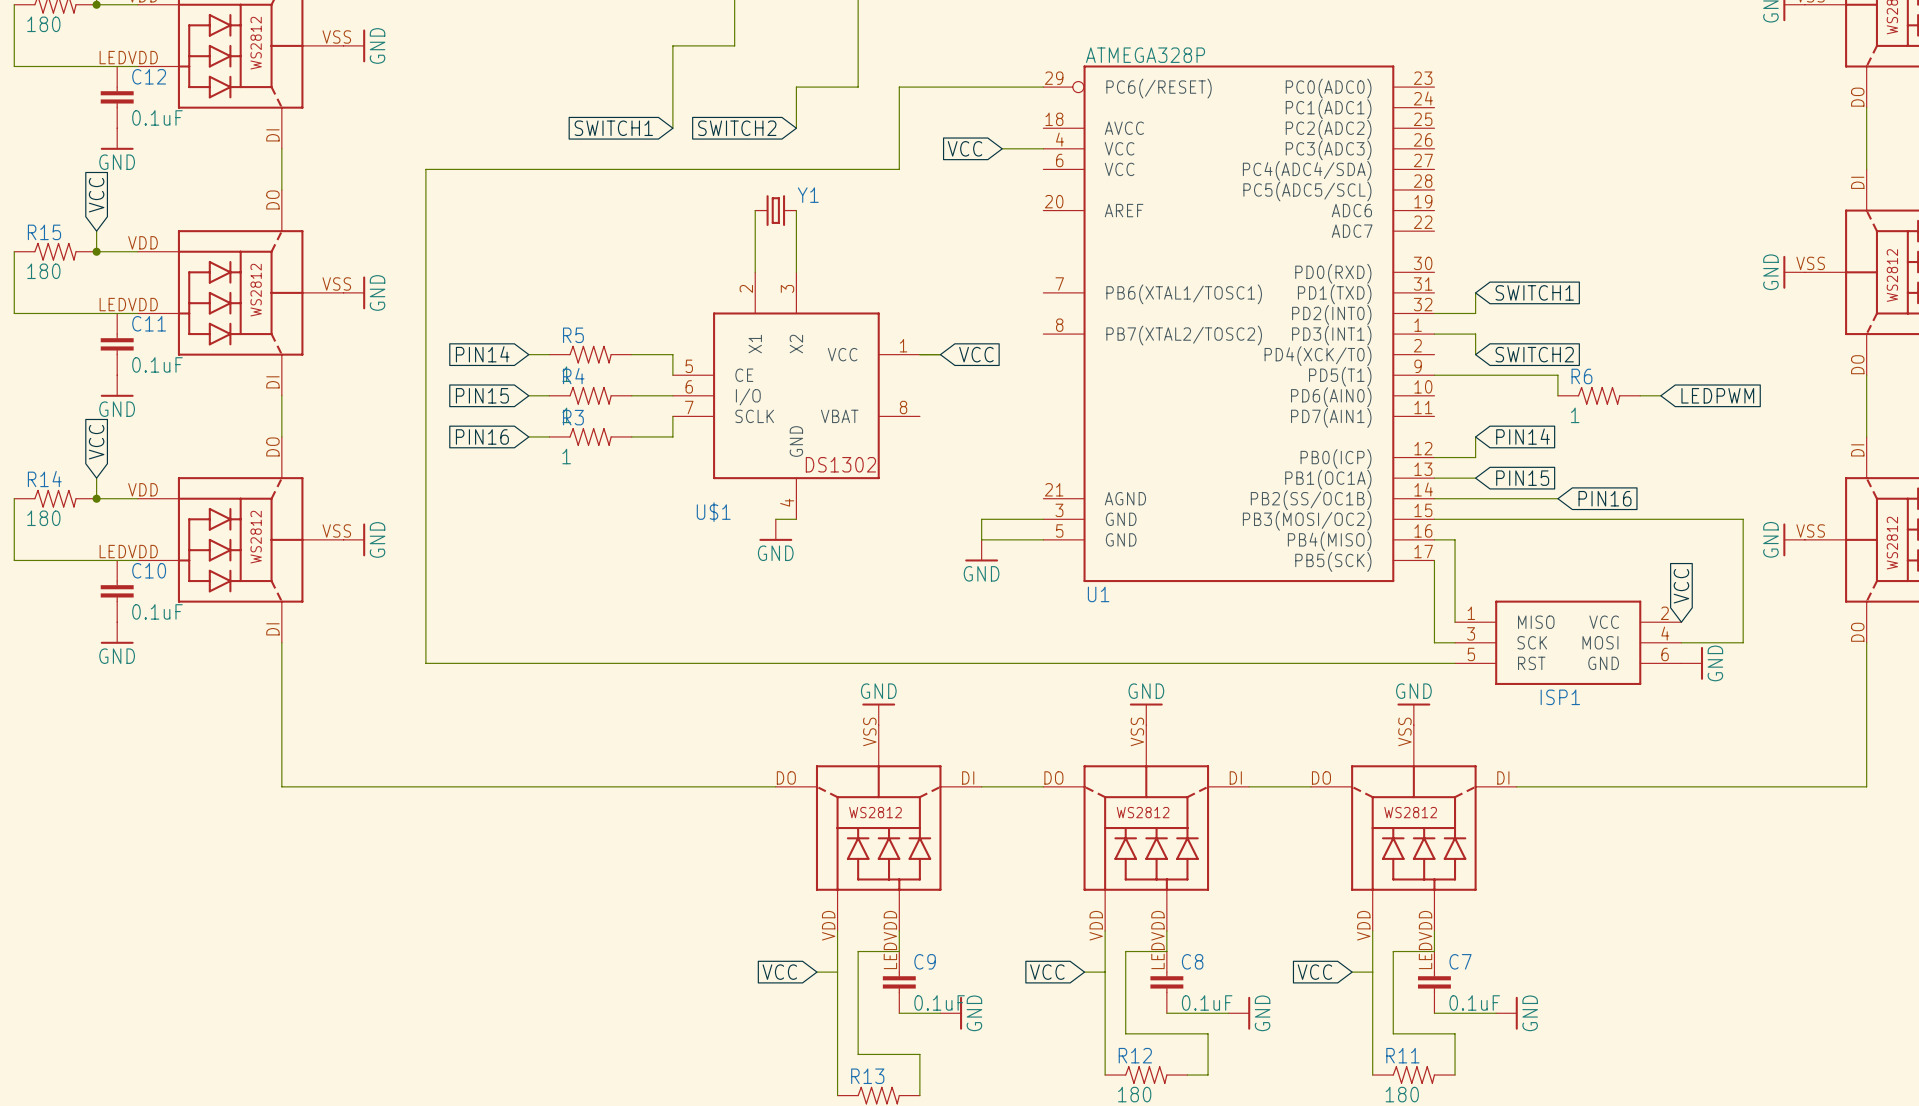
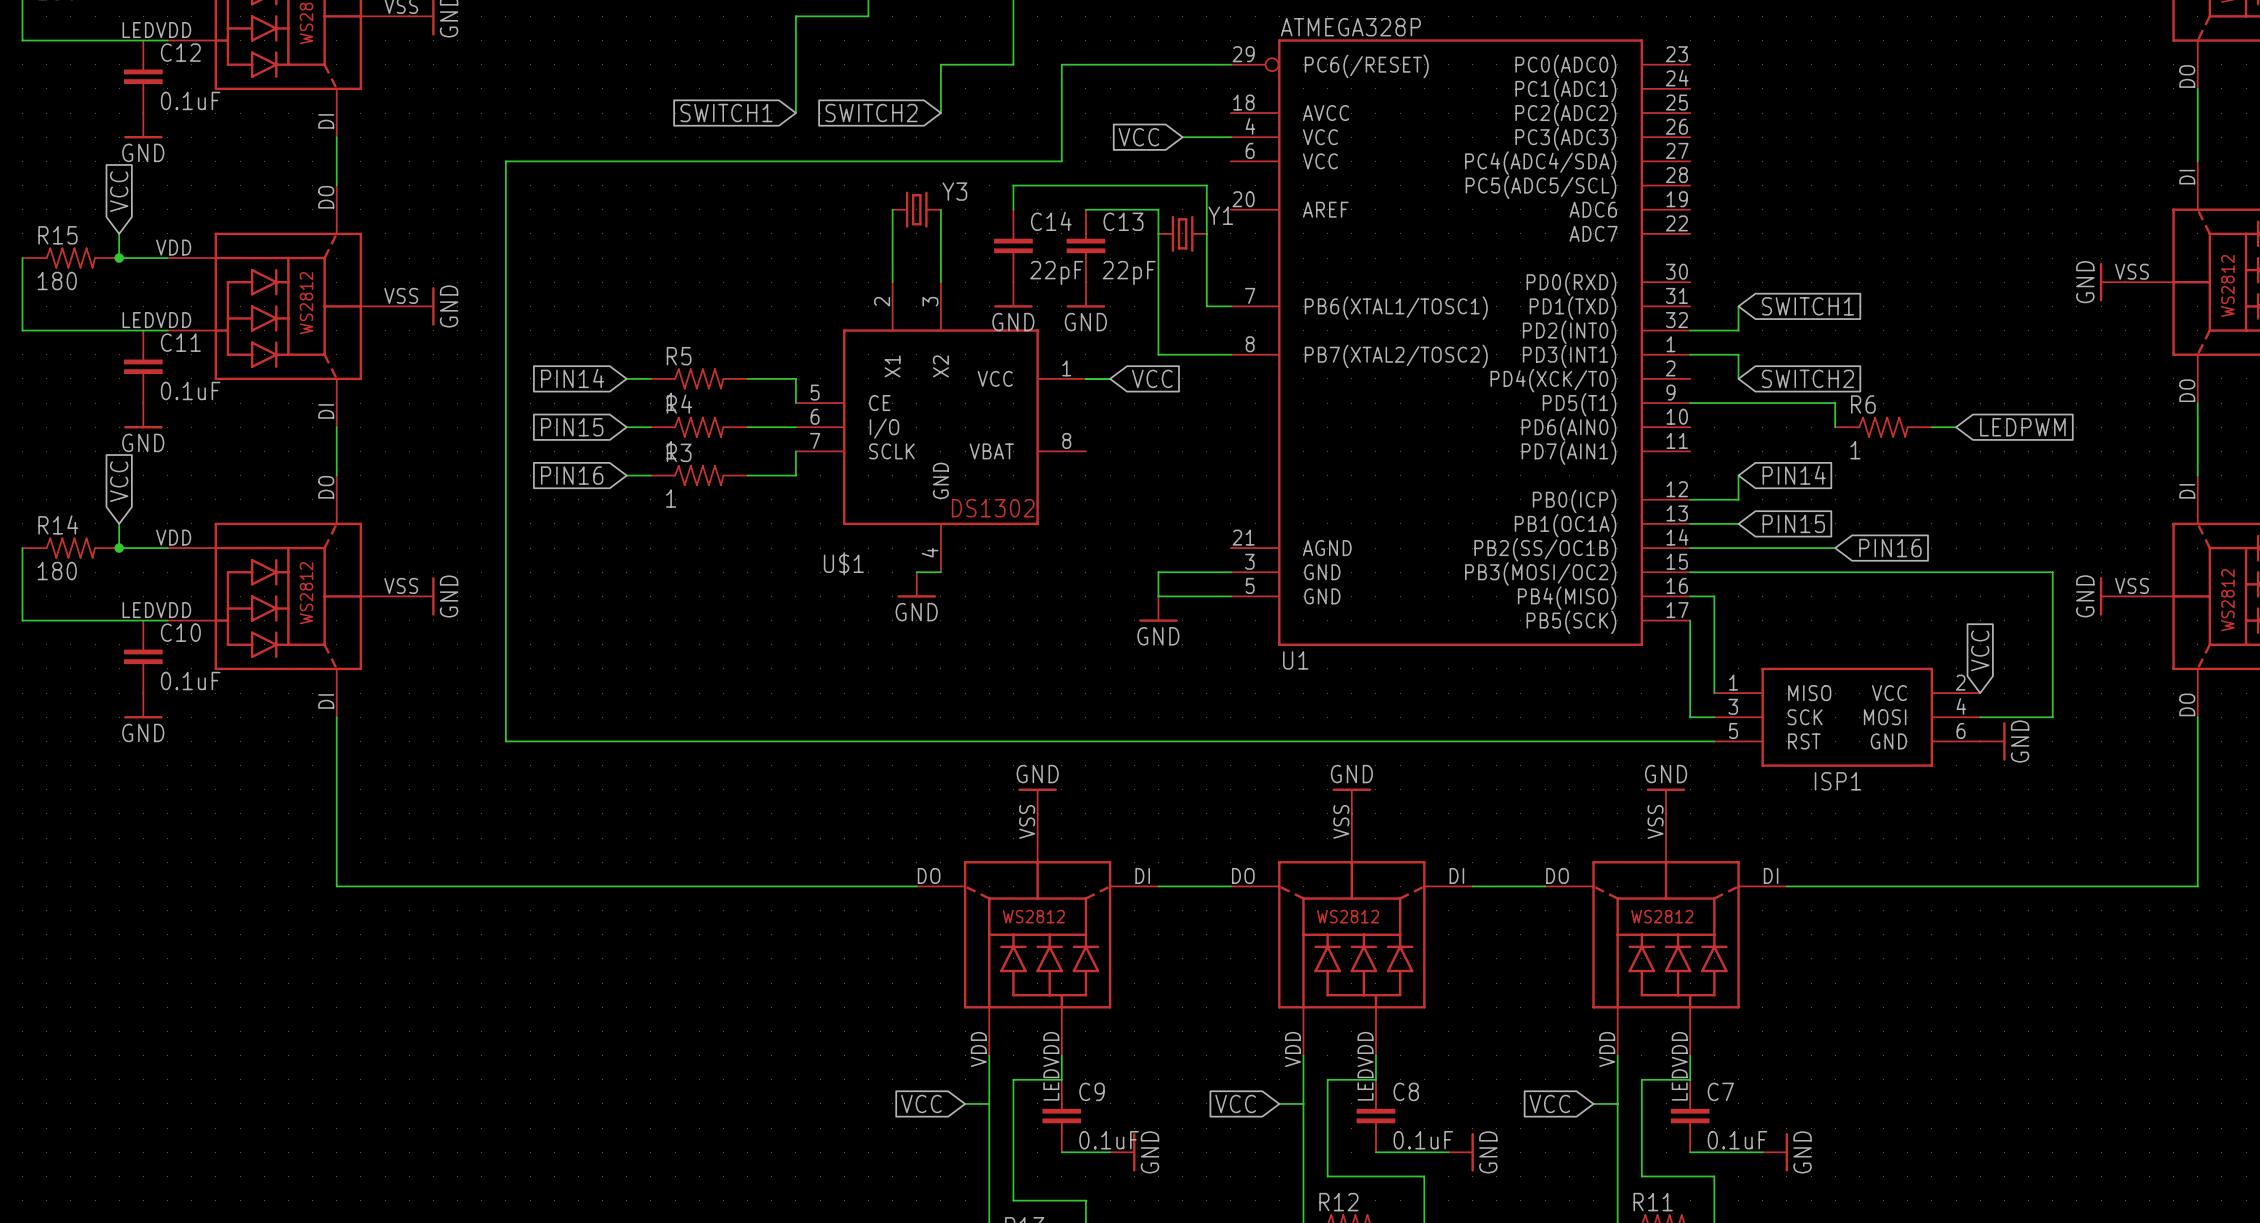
Y1 name: Y1 (808, 195) -> Y3 (954, 191)
wire: none -> (1013, 209) (1013, 185) (1206, 185) (1206, 306) (1230, 306)
wire: none -> (1085, 209) (1158, 209) (1158, 354) (1230, 354)
Y1: none -> (1182, 233)
C14: none -> 22pF (1013, 245)
C13: none -> 22pF (1085, 245)
power symbol: none -> GND (1013, 294)
power symbol: none -> GND (1085, 294)

